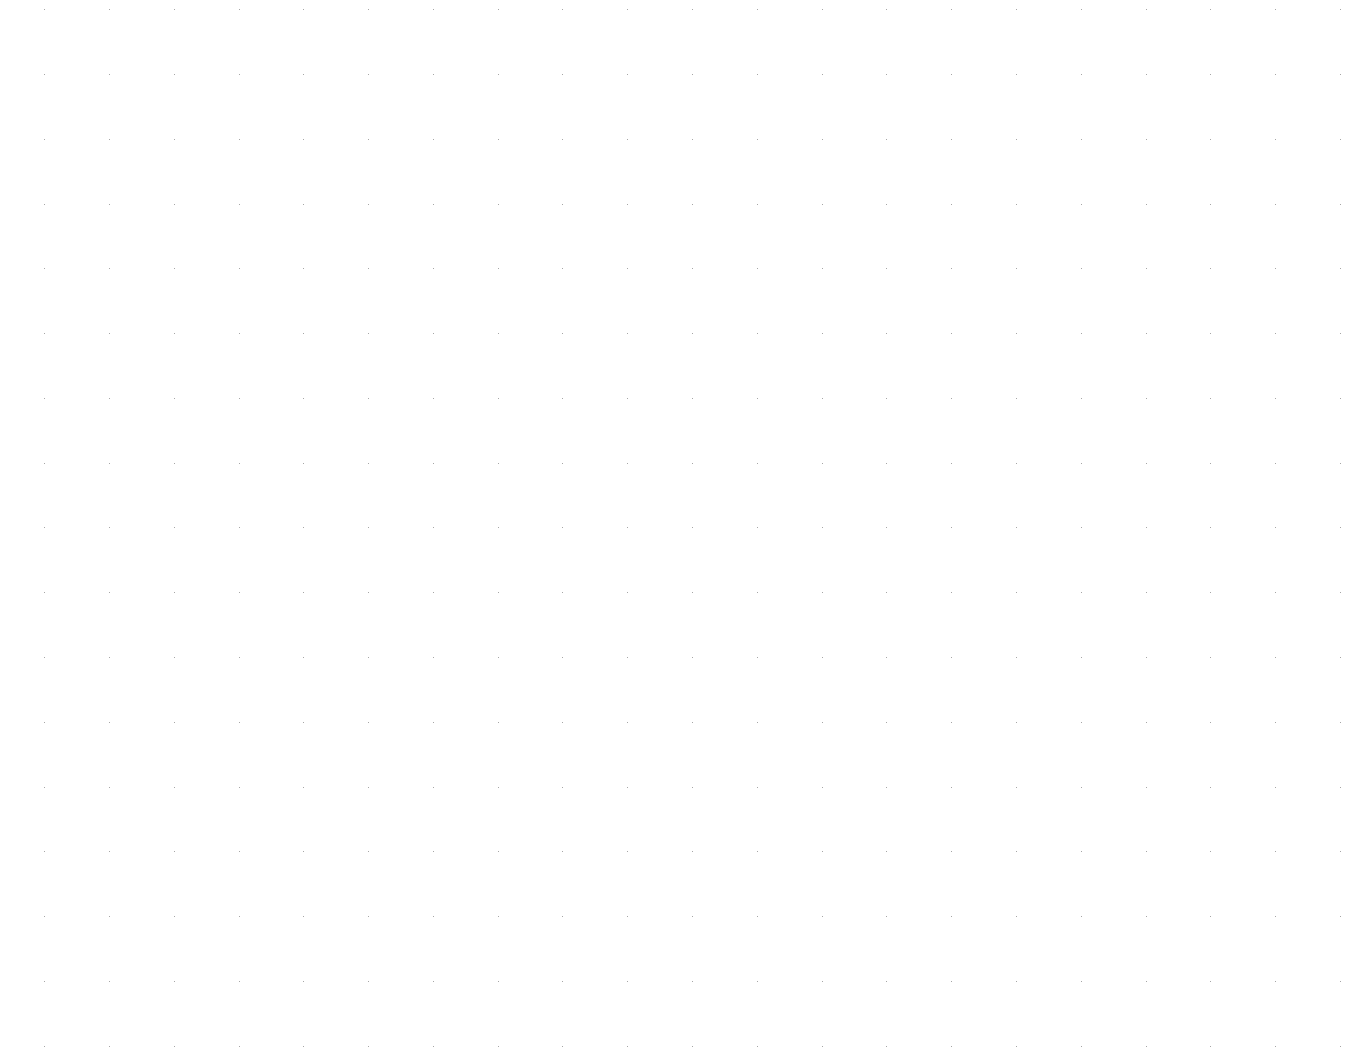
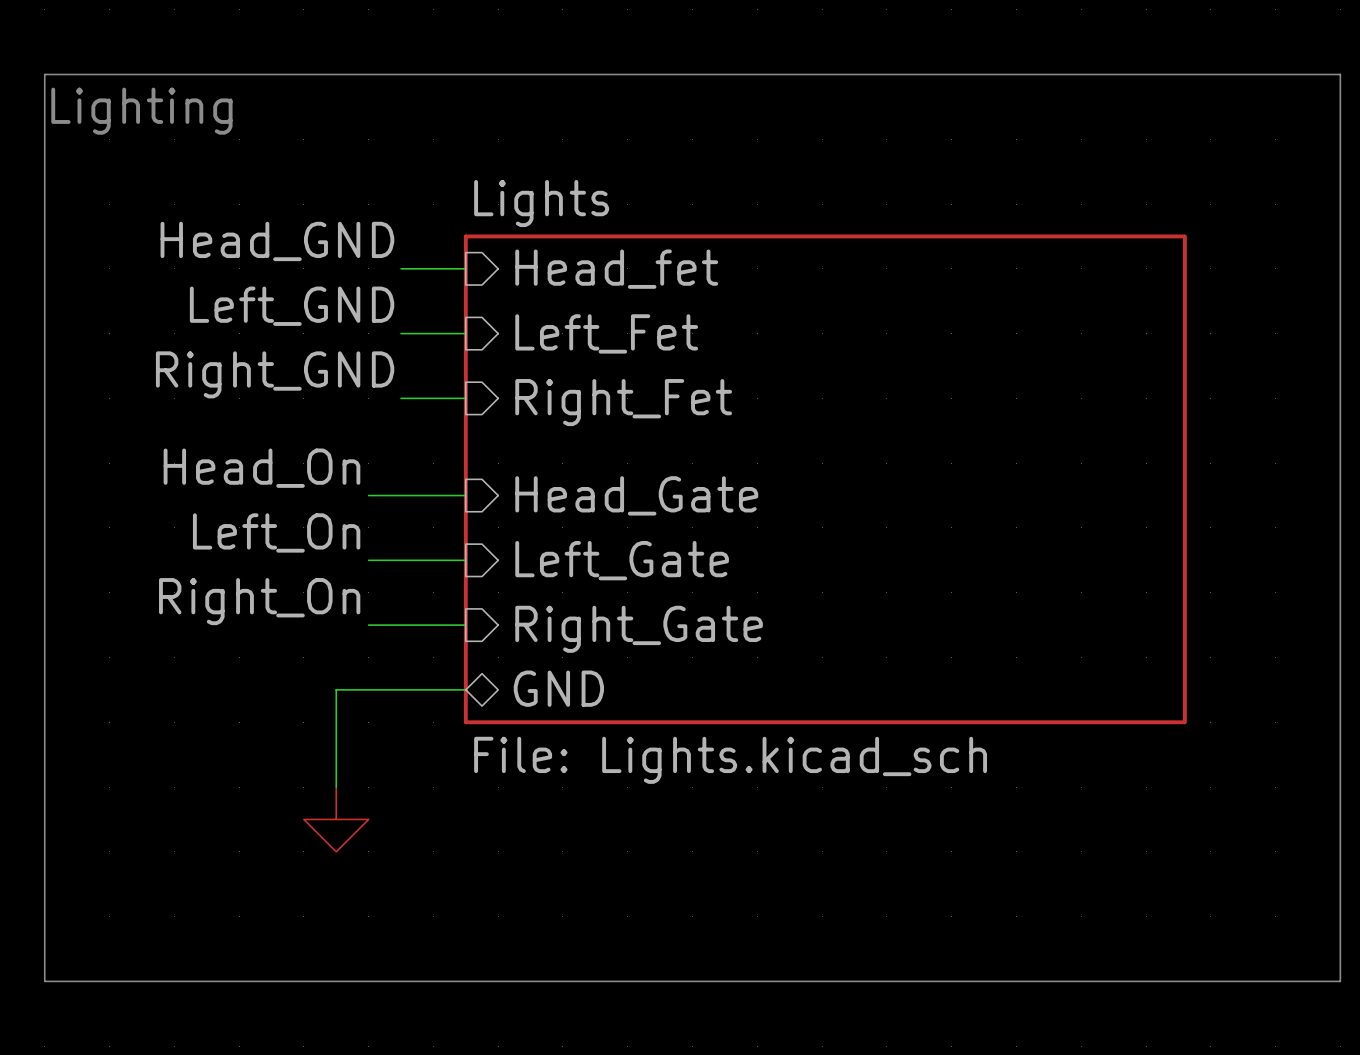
line: none -> (44, 74) (1340, 74) (1340, 981) (44, 981) (44, 74)
text: none -> Lighting (141, 111)
label: none -> Head_GND (277, 241)
wire: none -> (401, 268) (465, 268)
sheet pin: none -> Head_fet (616, 269)
label: none -> Left_GND (292, 306)
wire: none -> (401, 333) (465, 333)
sheet pin: none -> Left_Fet (606, 333)
label: none -> Right_GND (275, 374)
wire: none -> (401, 398) (465, 398)
sheet pin: none -> Right_Fet (623, 402)
label: none -> Head_On (261, 468)
sheet Lights: none -> File: Lights.kicad_sch (825, 479)
wire: none -> (368, 495) (465, 495)
sheet pin: none -> Head_Gate (636, 495)
label: none -> Left_On (276, 532)
wire: none -> (368, 560) (465, 560)
sheet pin: none -> Left_Gate (622, 560)
label: none -> Right_On (259, 601)
wire: none -> (368, 625) (465, 625)
sheet pin: none -> Right_Gate (639, 629)
sheet pin: none -> GND (558, 688)
wire: none -> (465, 689) (336, 689) (336, 787)
power symbol: none -> (336, 819)

